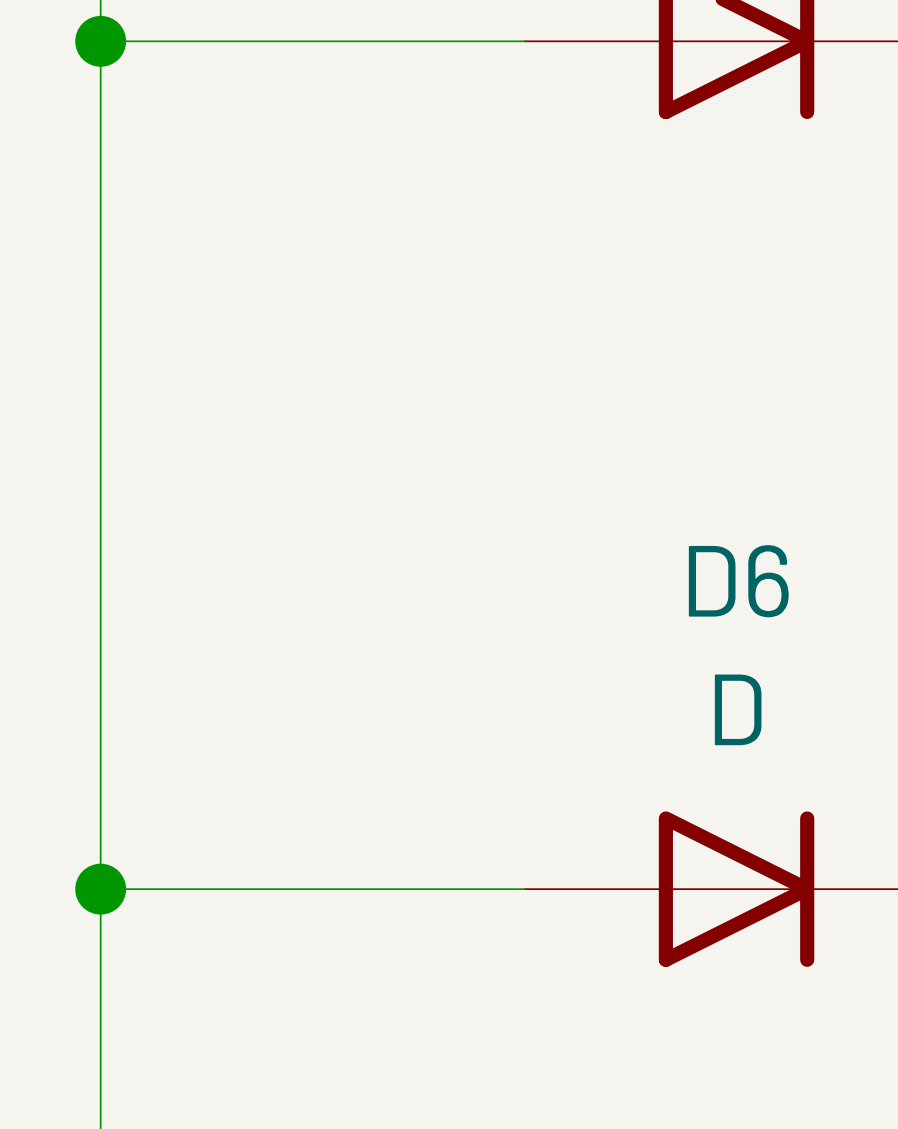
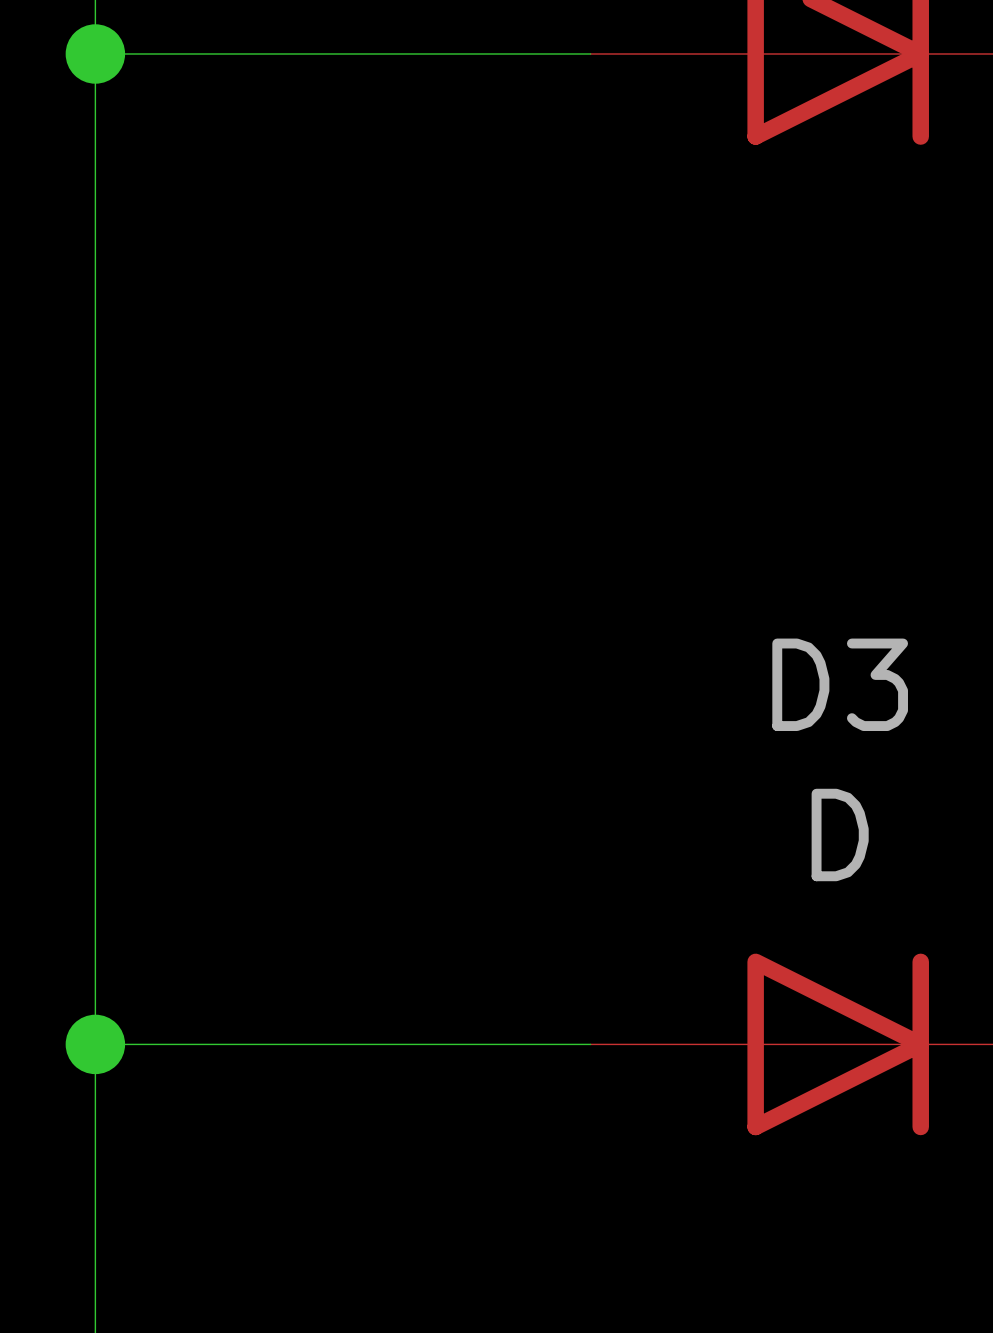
D6 name: D6 (738, 581) -> D3 (840, 684)

